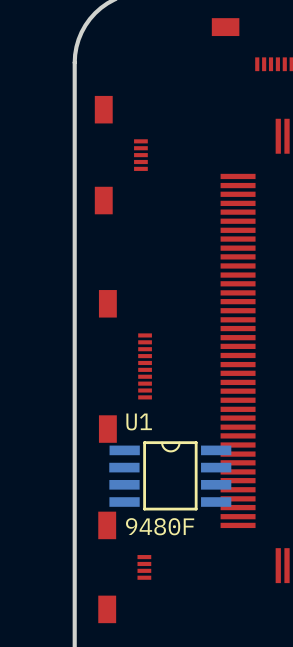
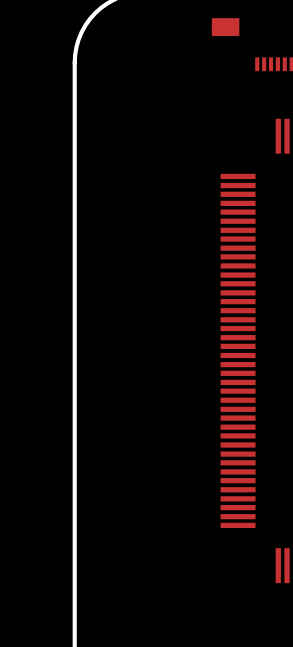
part: (121, 155) -> none
part: (125, 366) -> none
U1: 9480F (170, 475) -> none
part: (124, 567) -> none

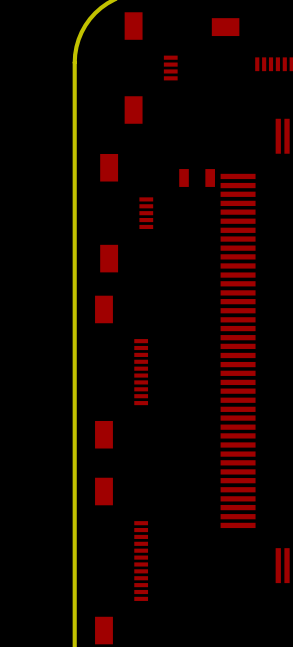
part: none -> (151, 68)
part: none -> (197, 177)
part: none -> (126, 213)
part: none -> (121, 372)
part: none -> (121, 561)

